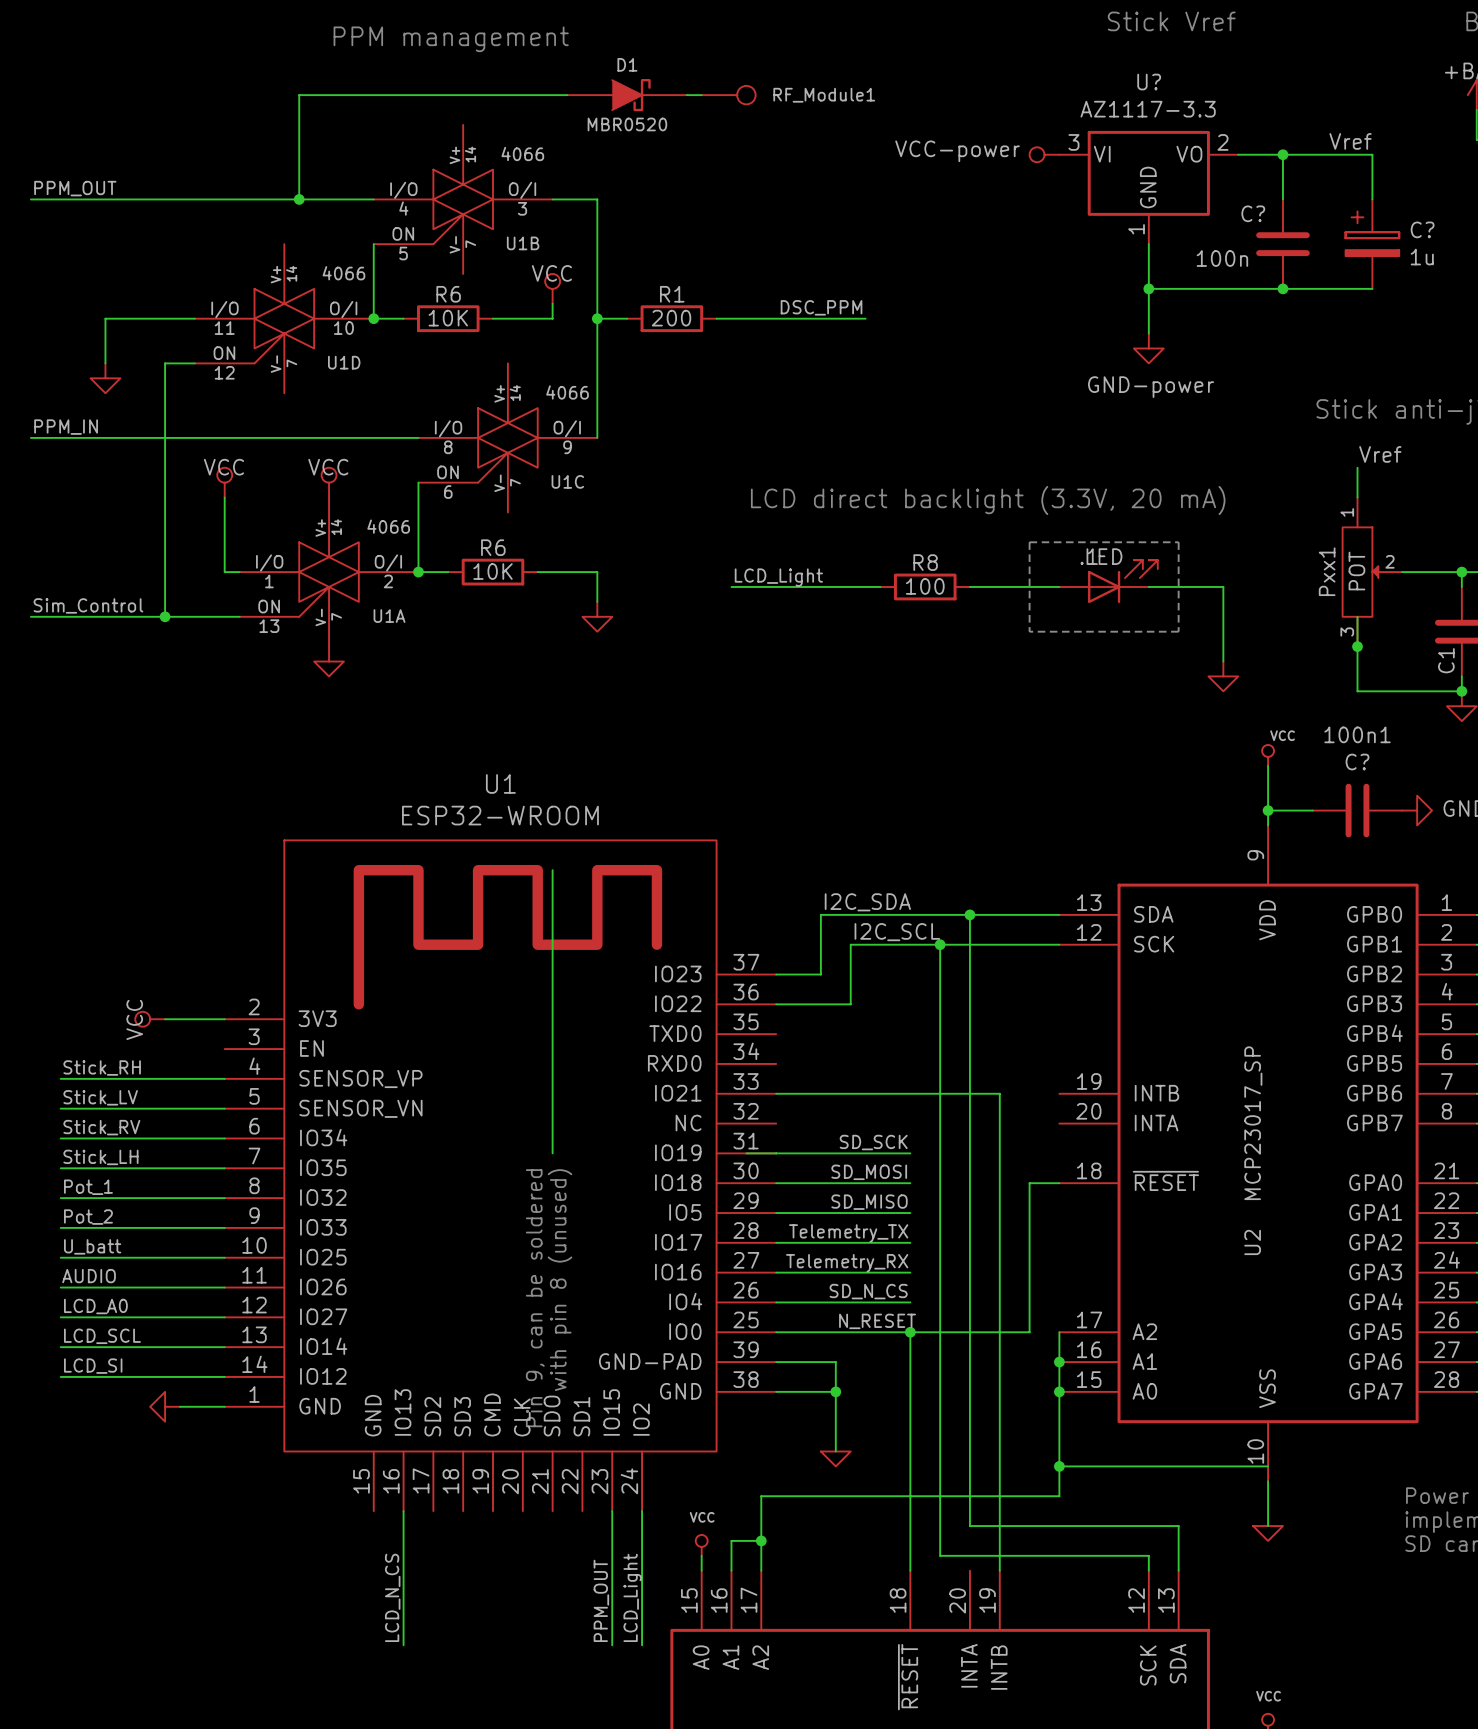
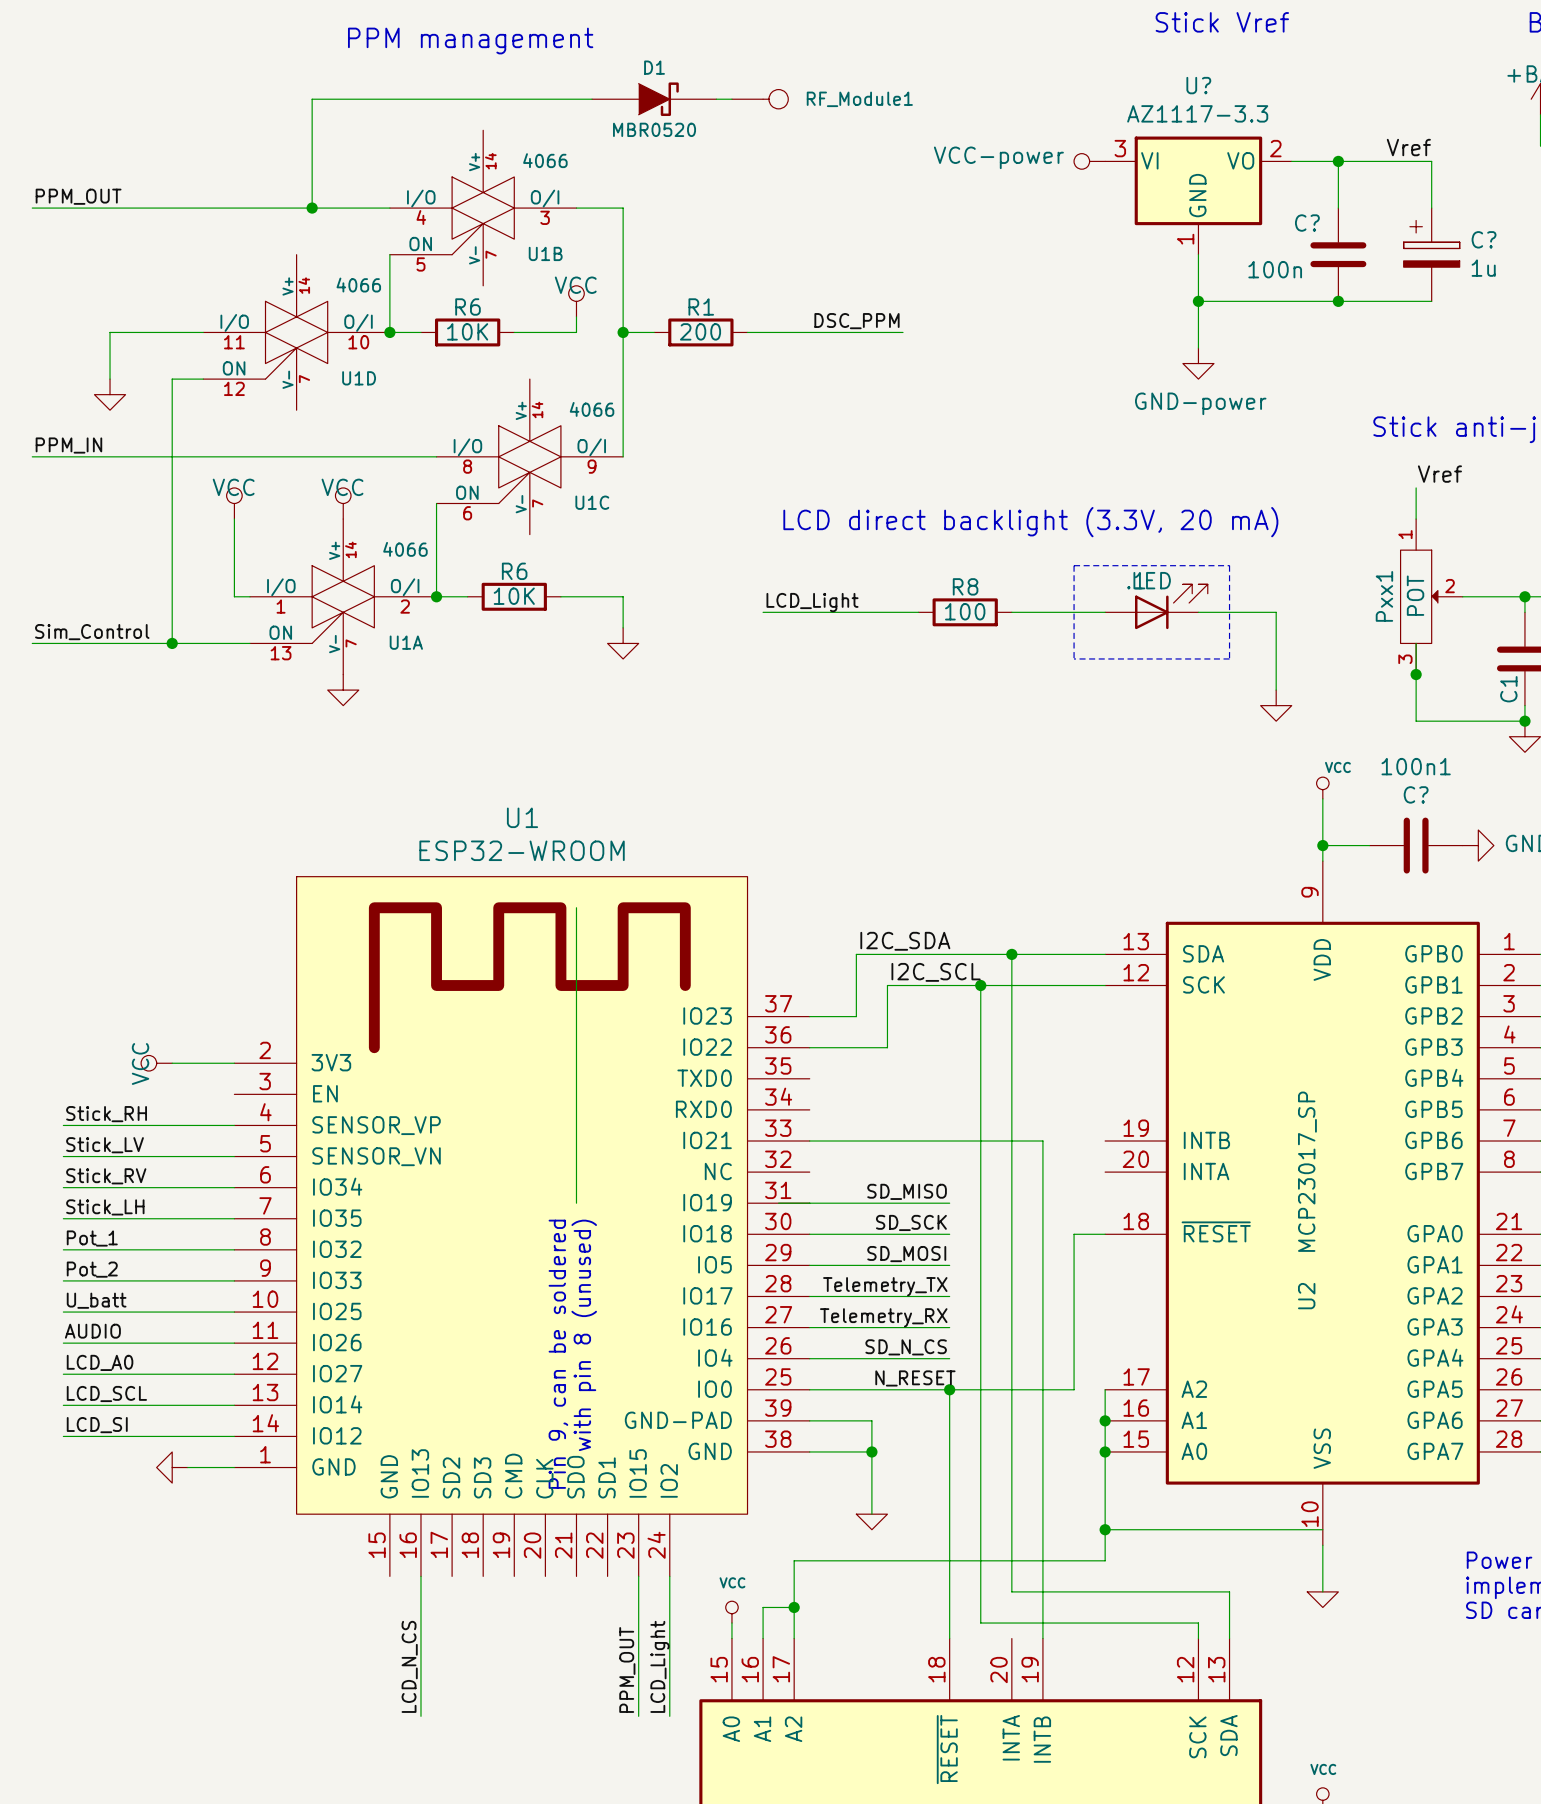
label: SD_SCK (873, 1142) -> SD_MISO (907, 1191)
label: SD_MOSI (869, 1172) -> SD_SCK (911, 1222)
label: SD_MISO (869, 1202) -> SD_MOSI (906, 1254)

